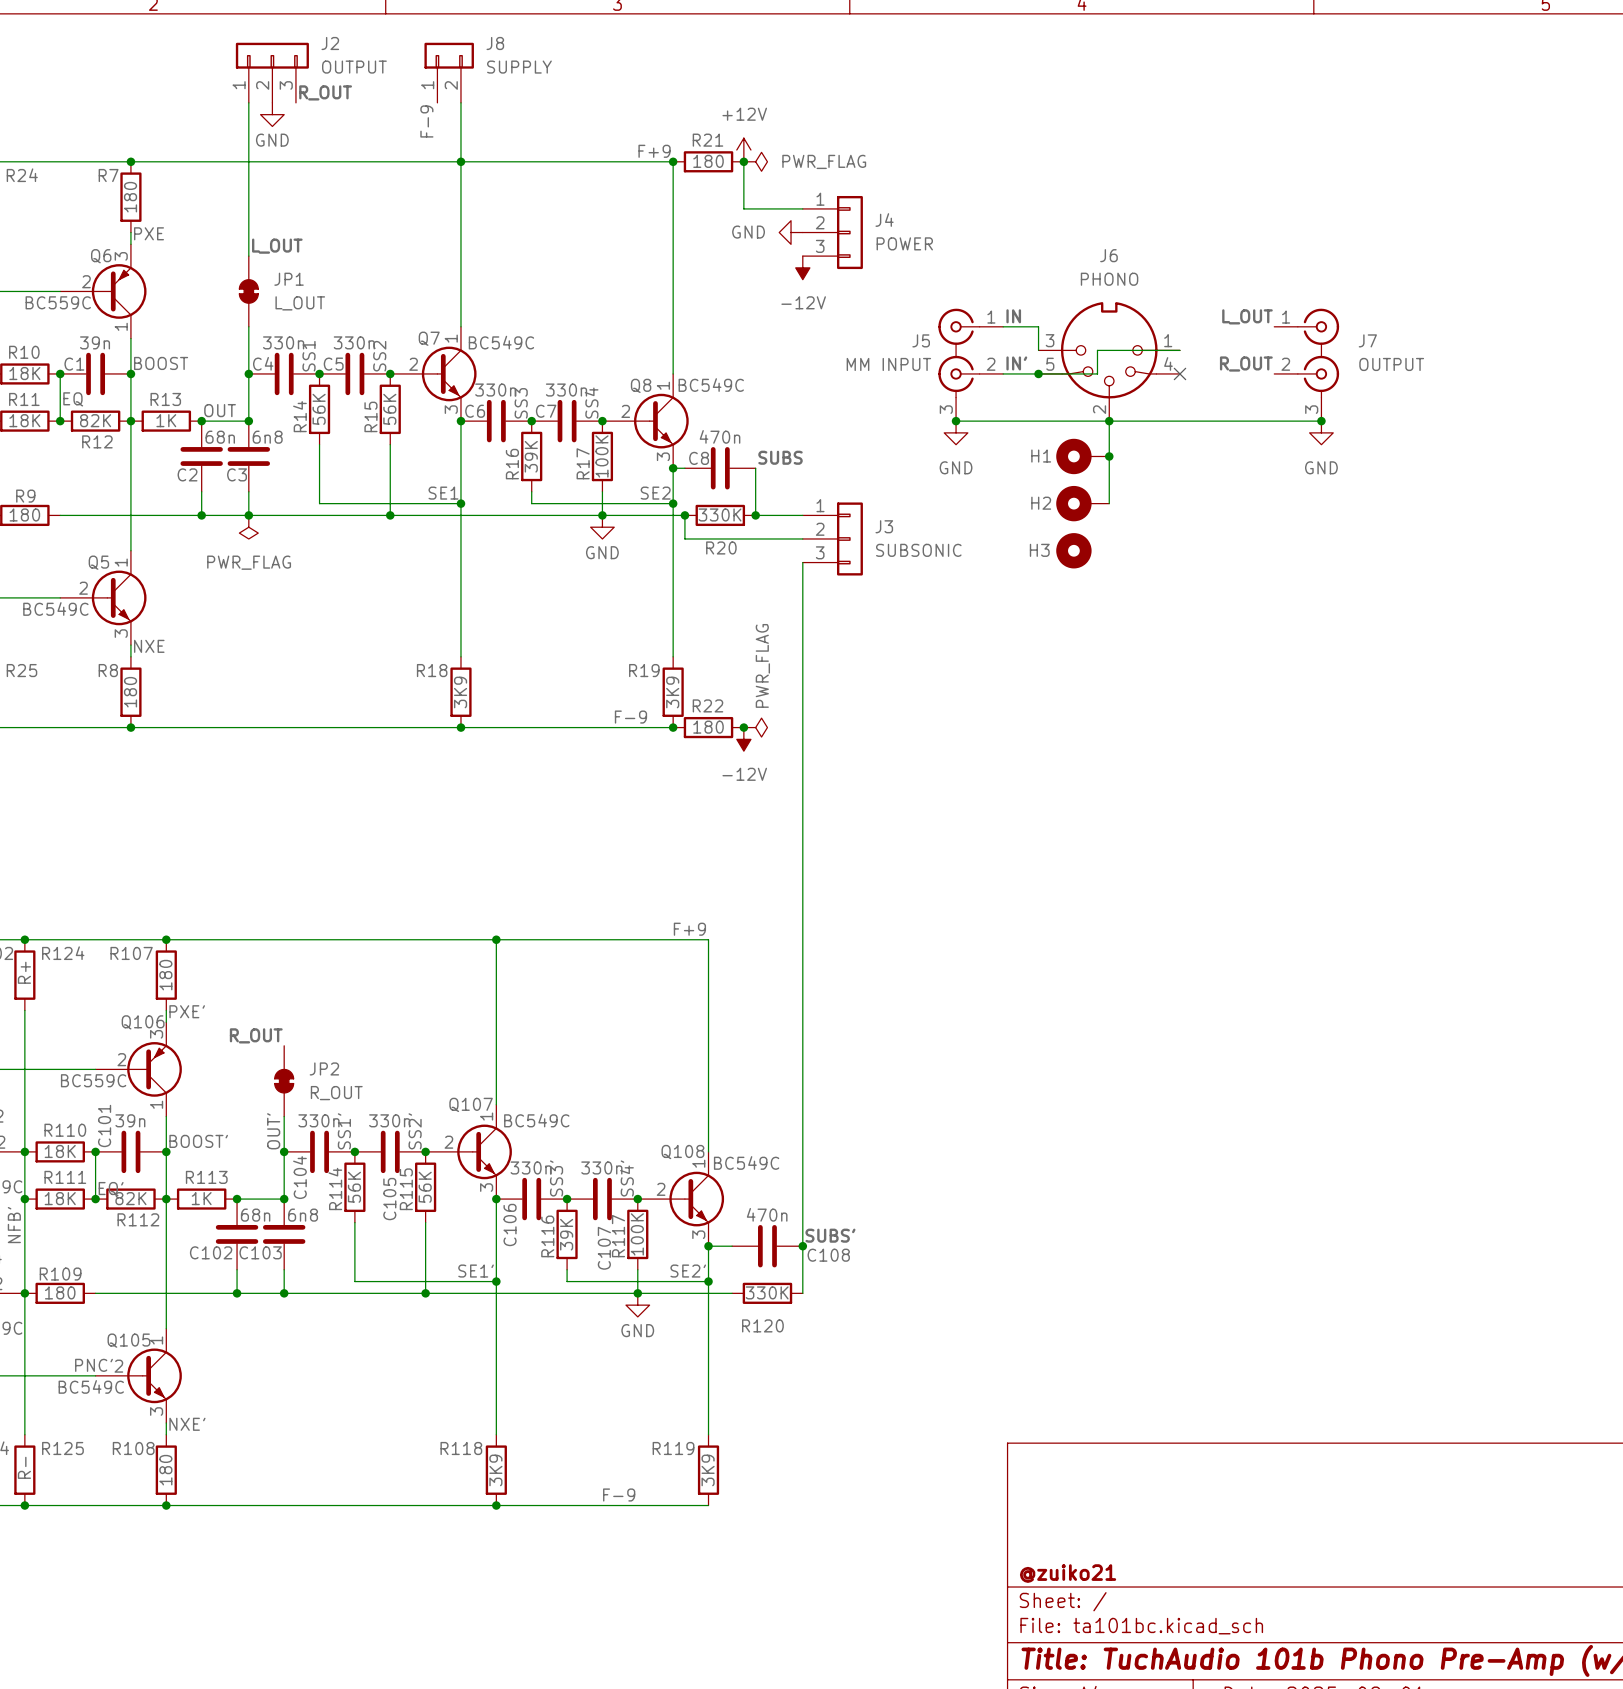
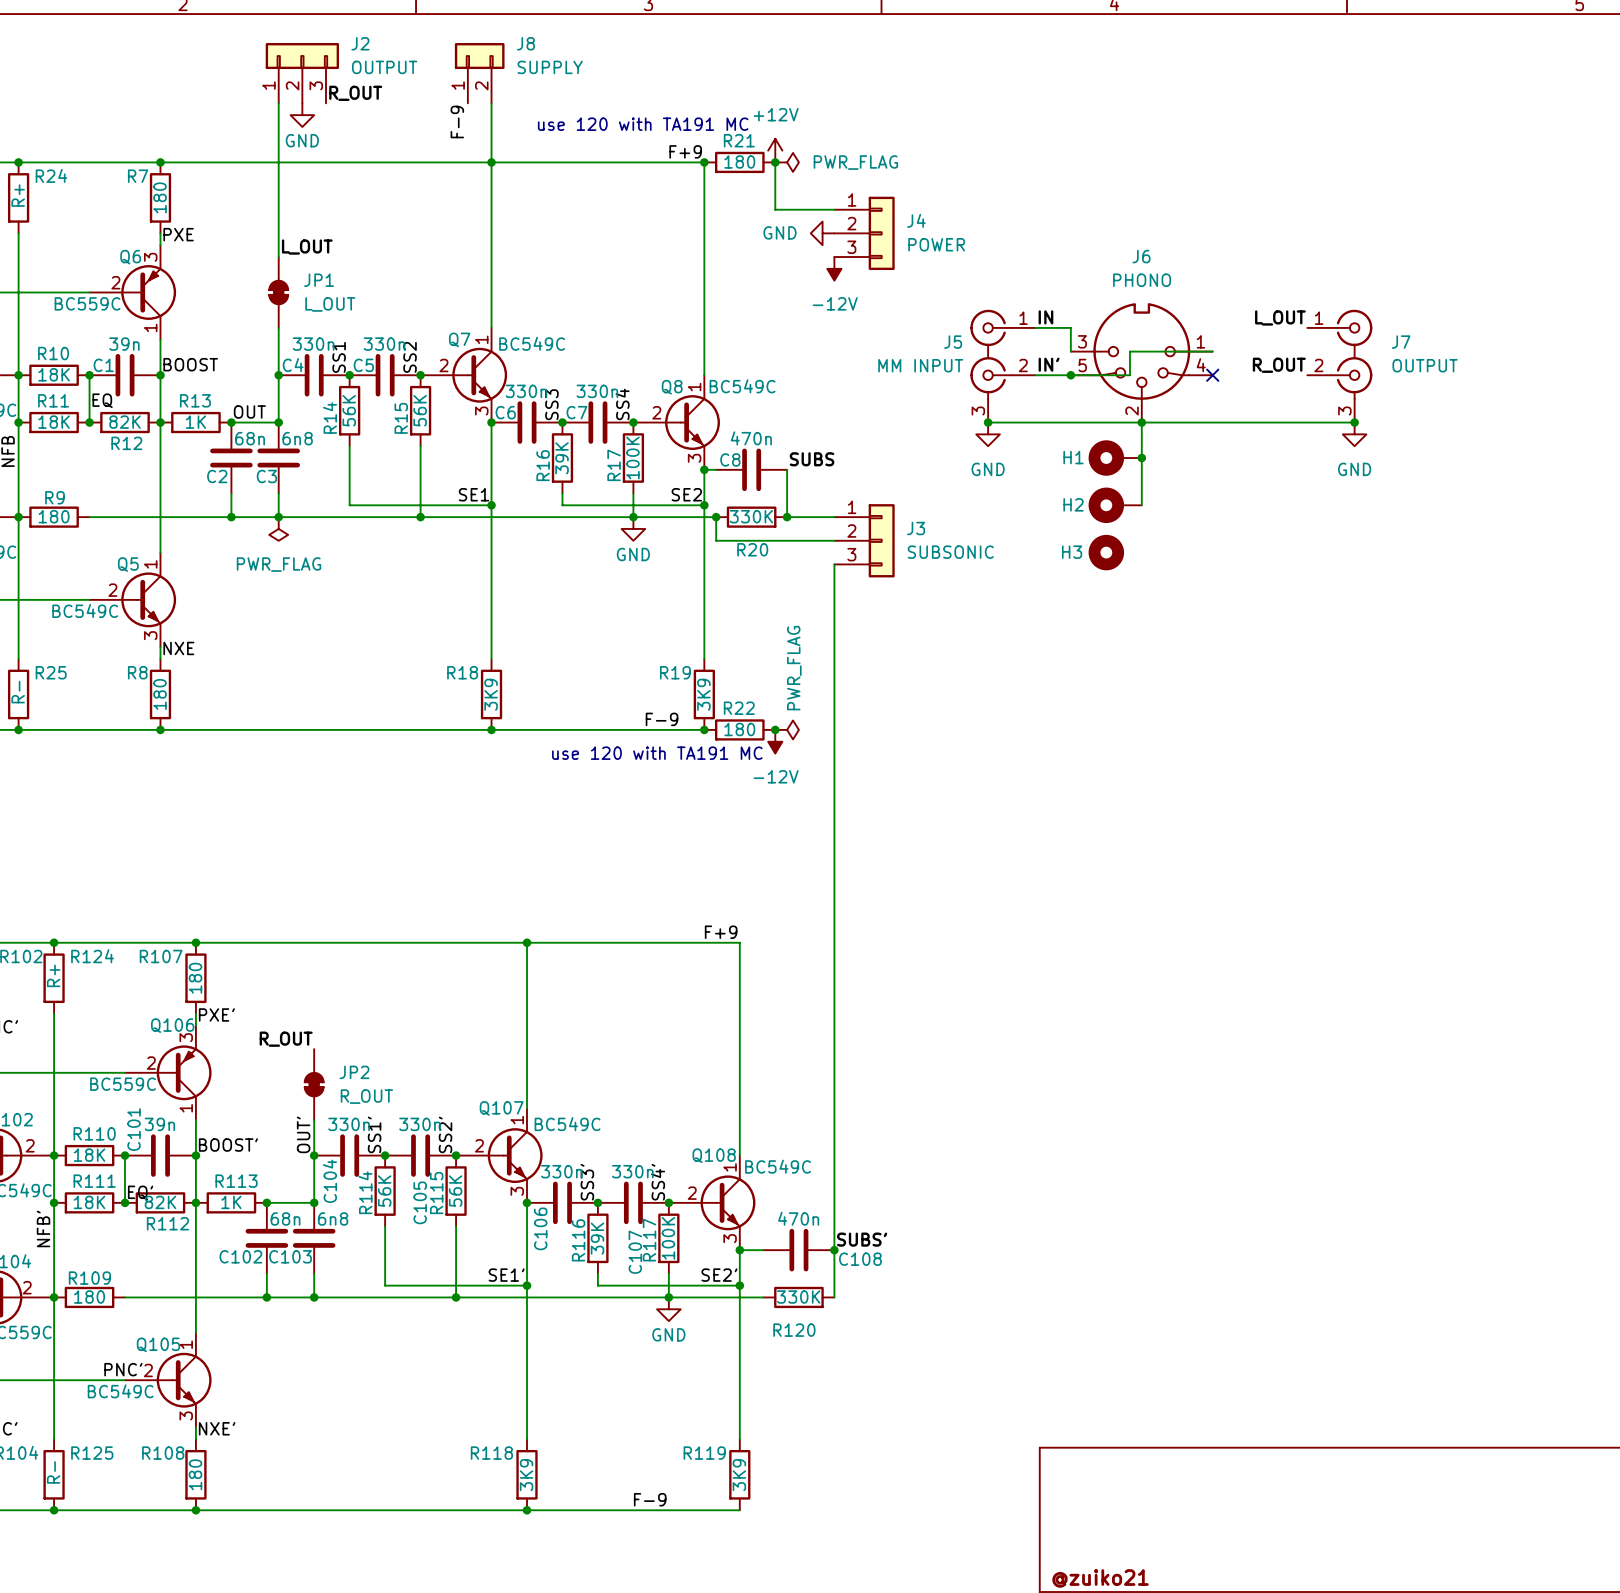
text: none -> use 120 with TA191 MC (643, 124)
text: none -> use 120 with TA191 MC (657, 753)

